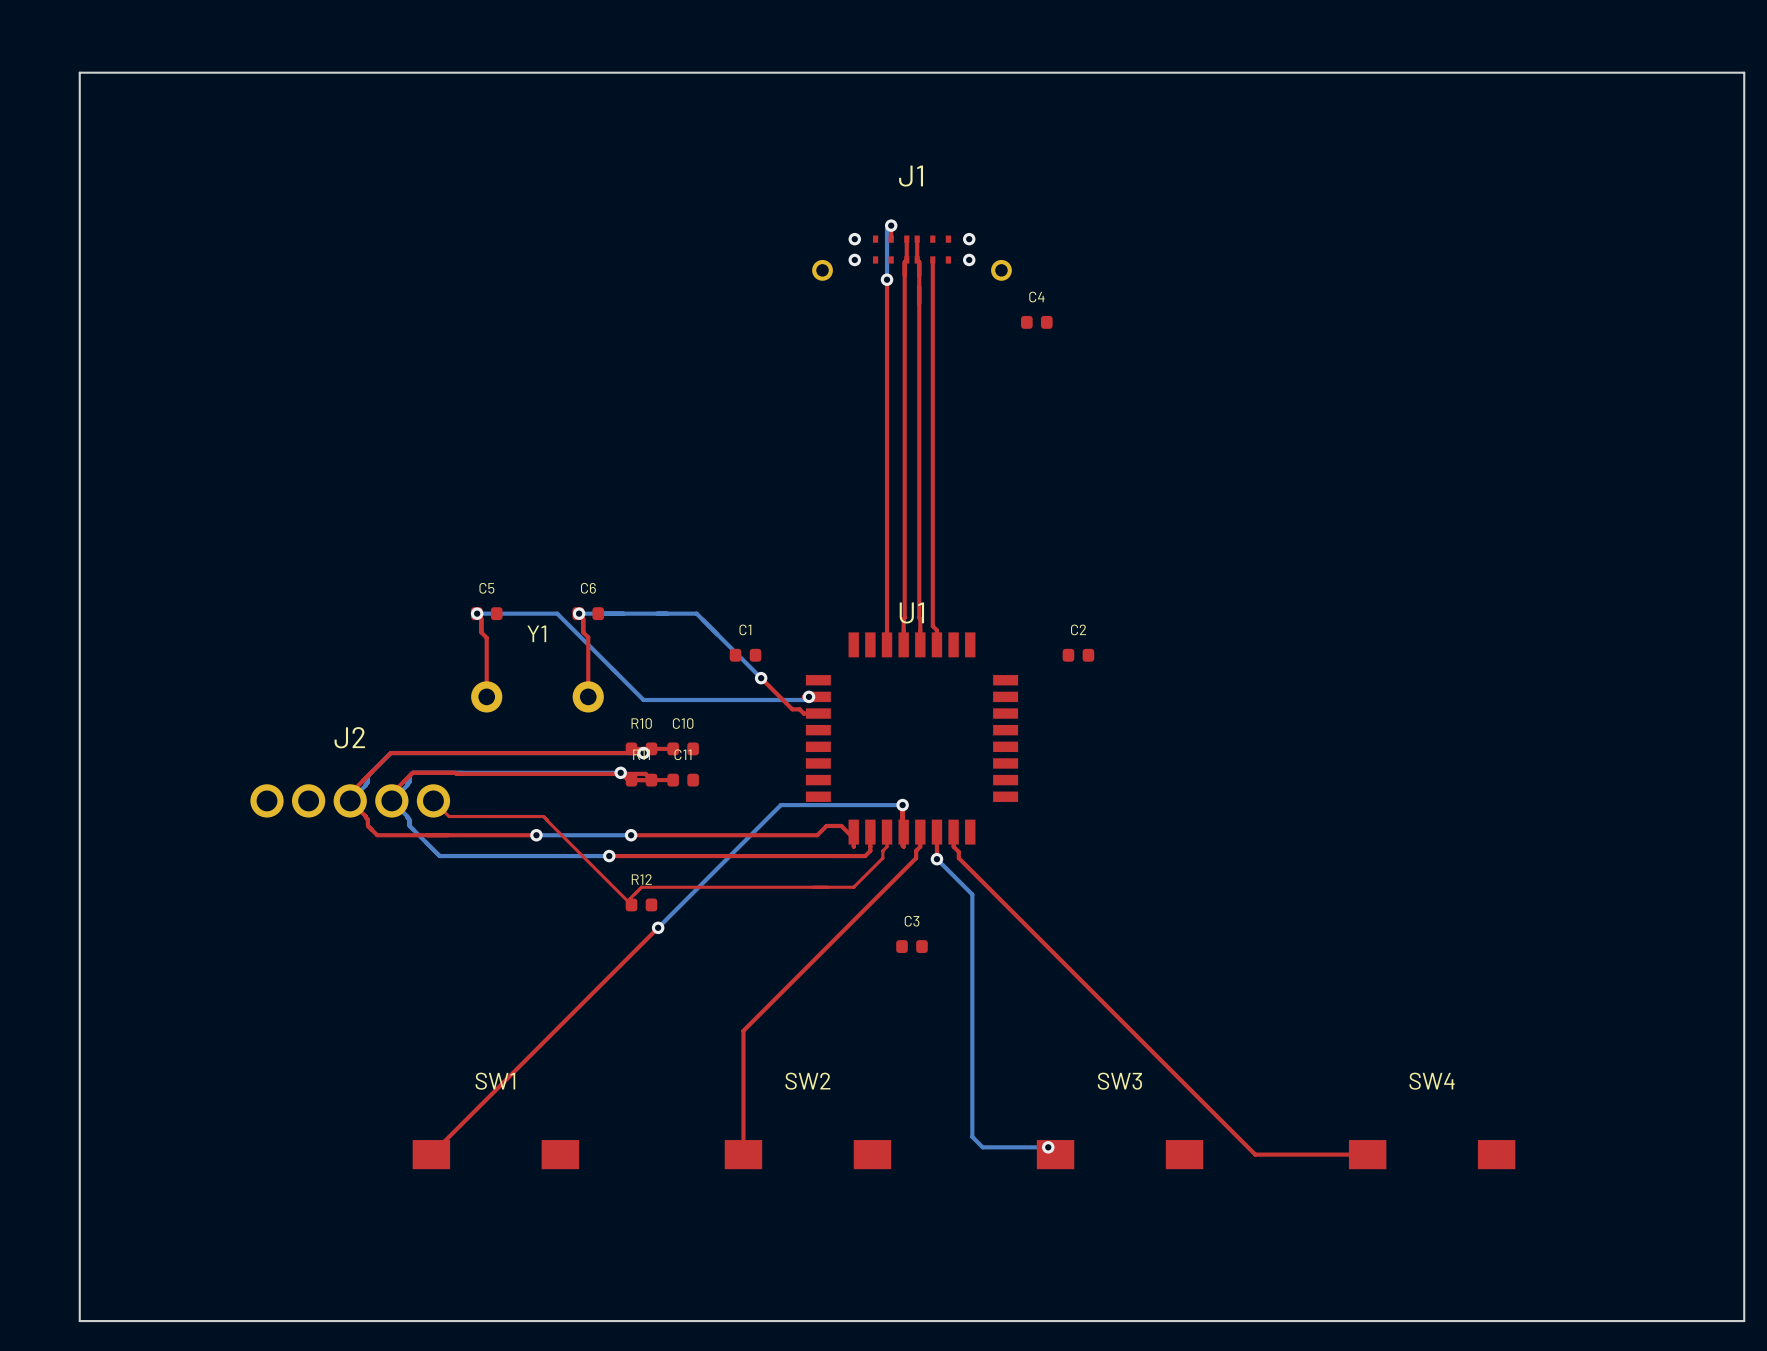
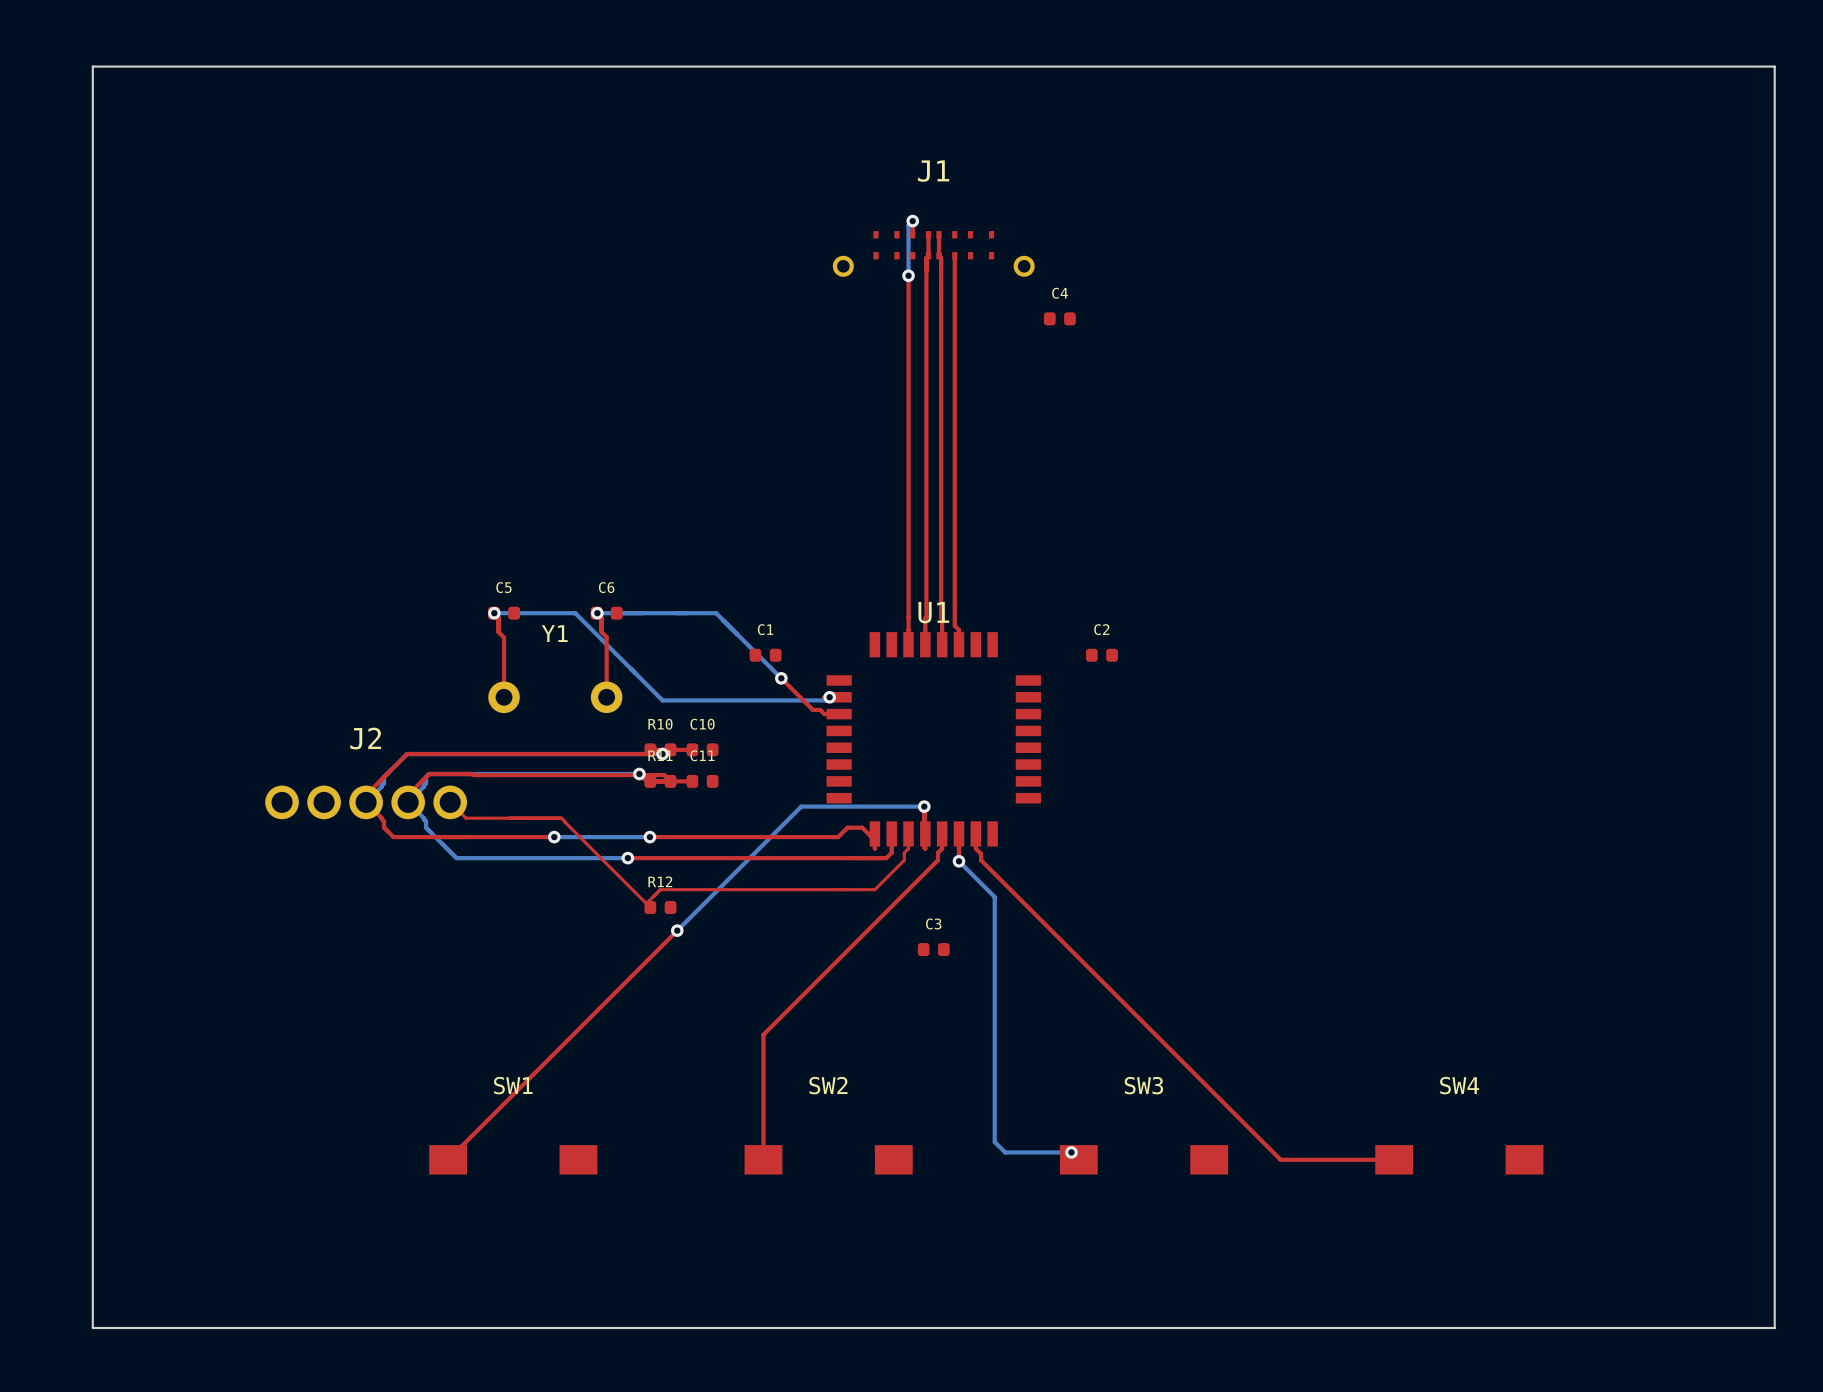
via: (854, 239) -> none
via: (969, 239) -> none
via: (854, 259) -> none
via: (969, 259) -> none

